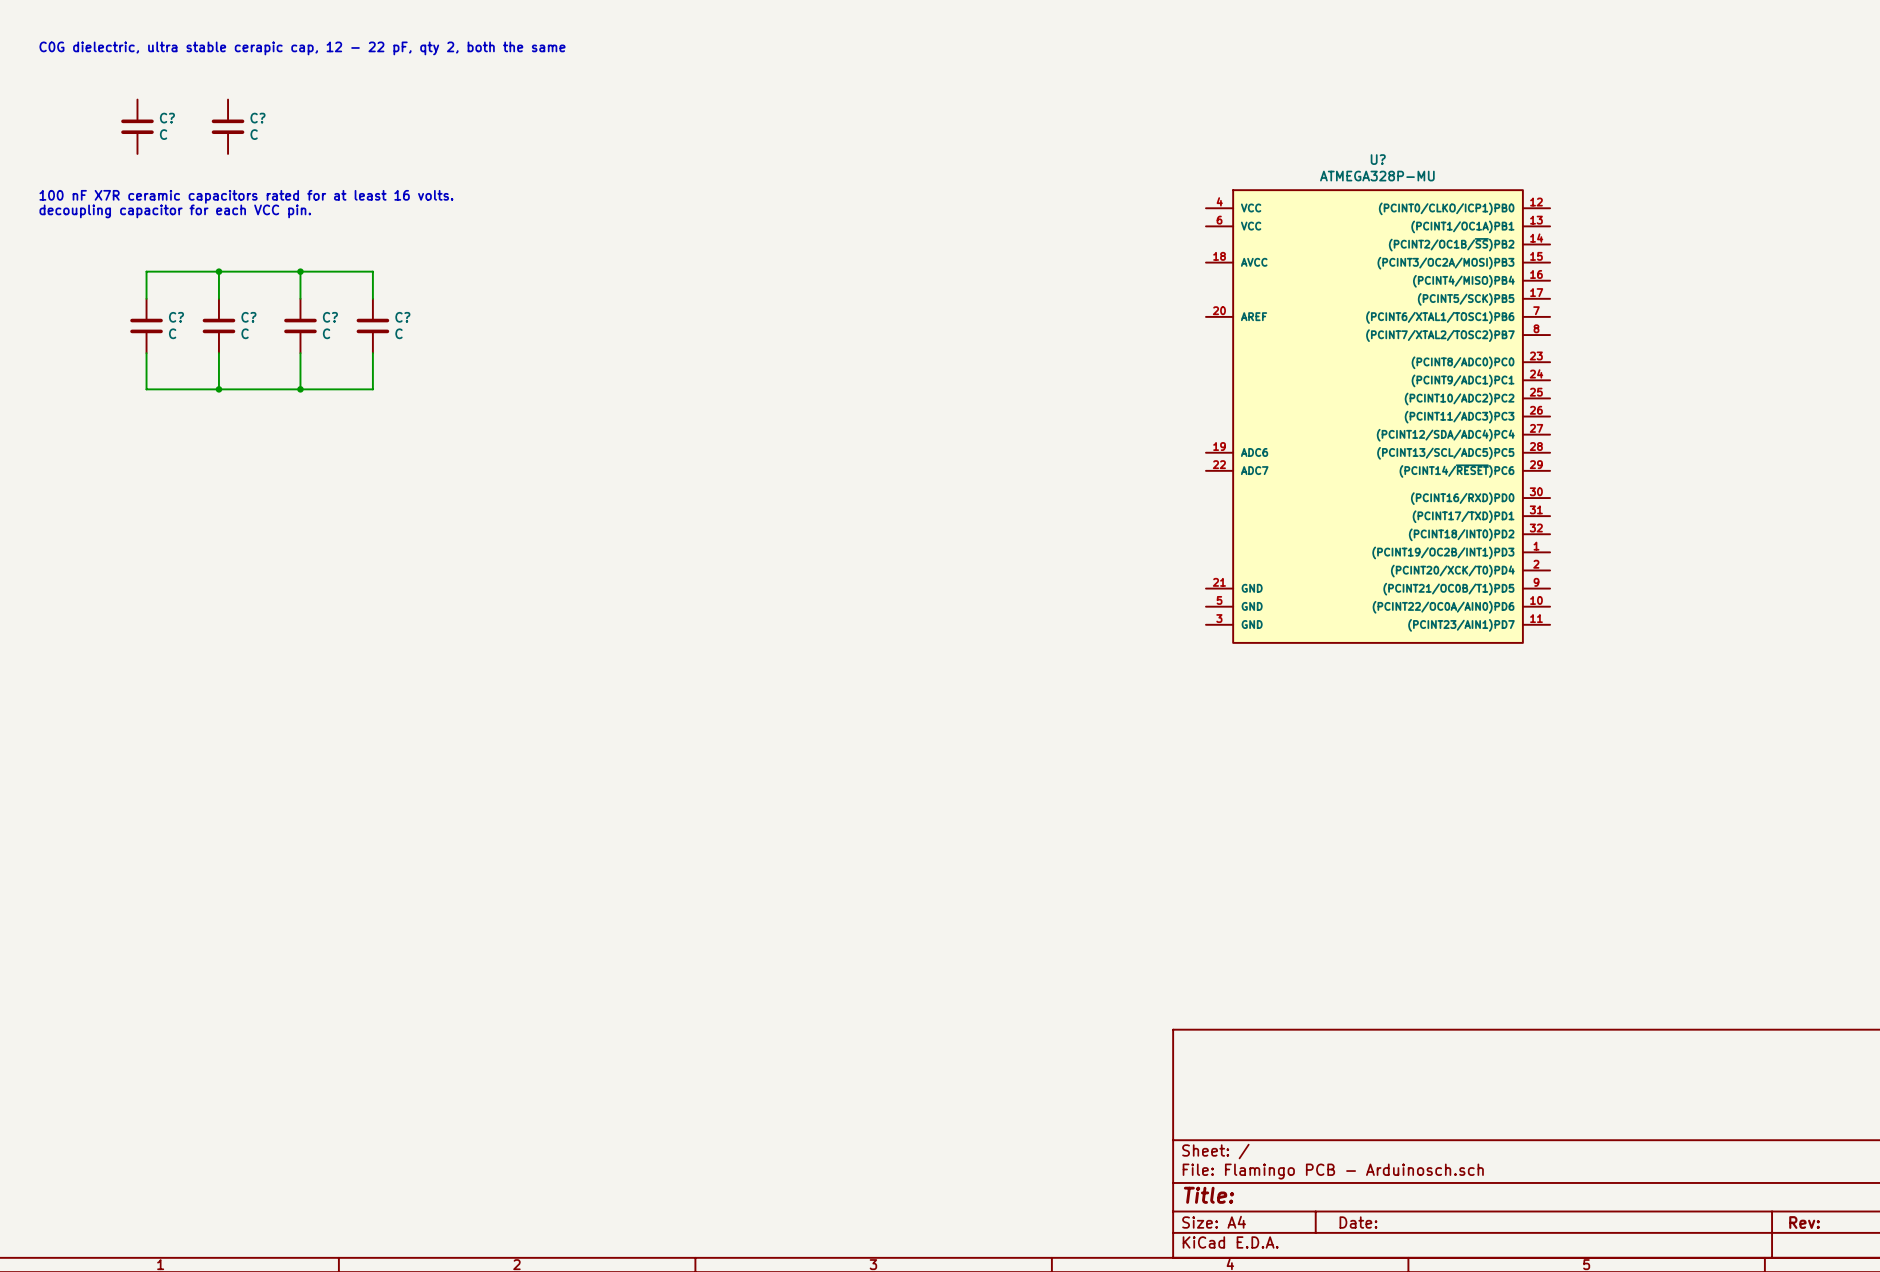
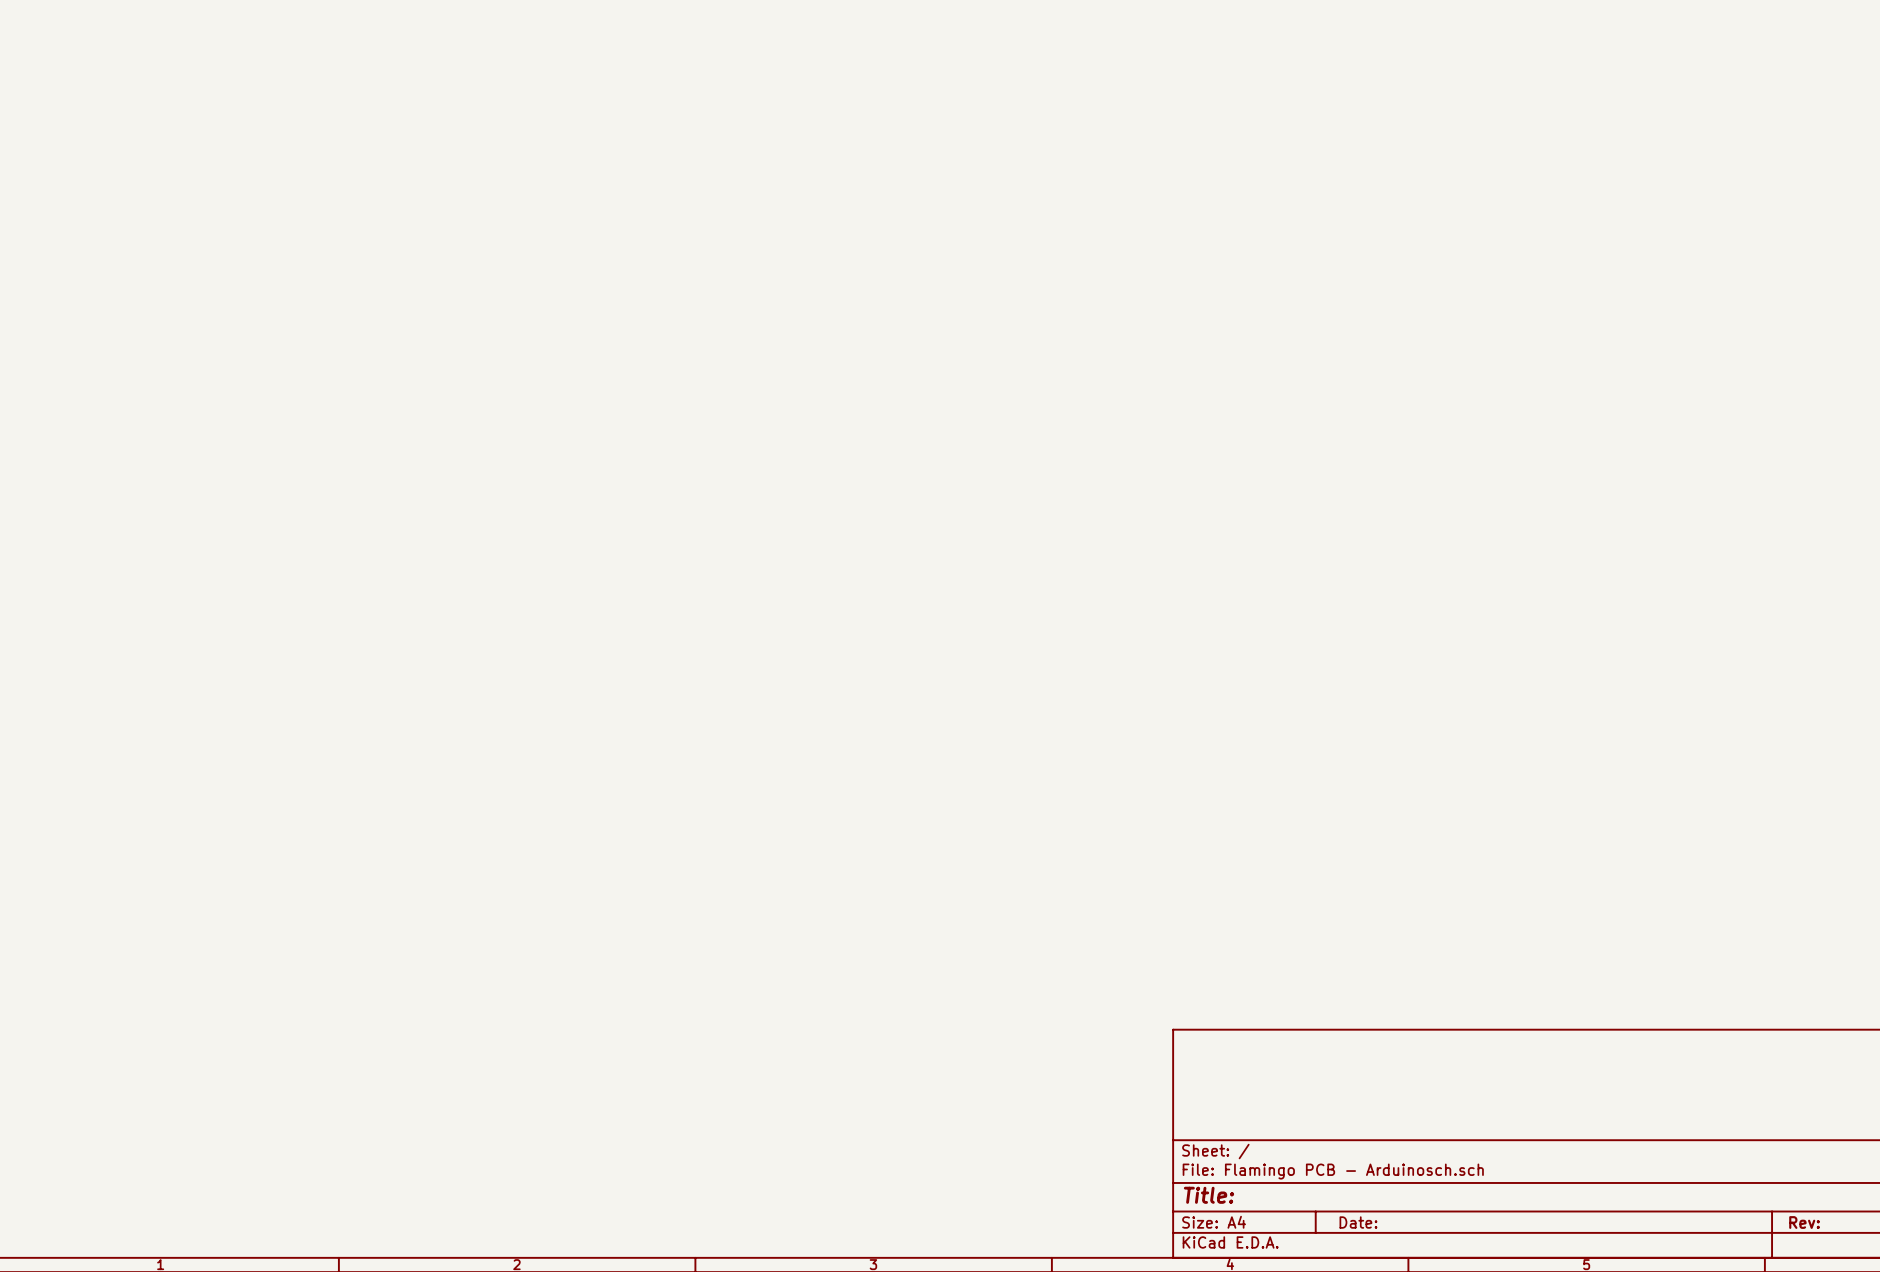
text: C0G dielectric, ultra stable cerapic cap, 12 - 22 pF, qty 2, both the same (302, 48) -> none
C?: C (137, 126) -> none
C?: C (228, 126) -> none
text: 100 nF X7R ceramic capacitors rated for at least 16 volts. (246, 196) -> none
text: decoupling capacitor for each VCC pin. (175, 211) -> none
wire: (218, 271) (218, 298) -> none
junction: (218, 271) -> none
wire: (300, 271) (300, 298) -> none
junction: (300, 271) -> none
wire: (146, 298) (146, 271) (372, 271) (372, 298) -> none
C?: C (146, 325) -> none
C?: C (218, 325) -> none
C?: C (300, 325) -> none
C?: C (372, 325) -> none
wire: (146, 353) (146, 389) (372, 389) (372, 353) -> none
wire: (218, 353) (218, 389) -> none
wire: (300, 353) (300, 389) -> none
junction: (218, 389) -> none
junction: (300, 389) -> none
U?: ATMEGA328P-MU (1378, 416) -> none

